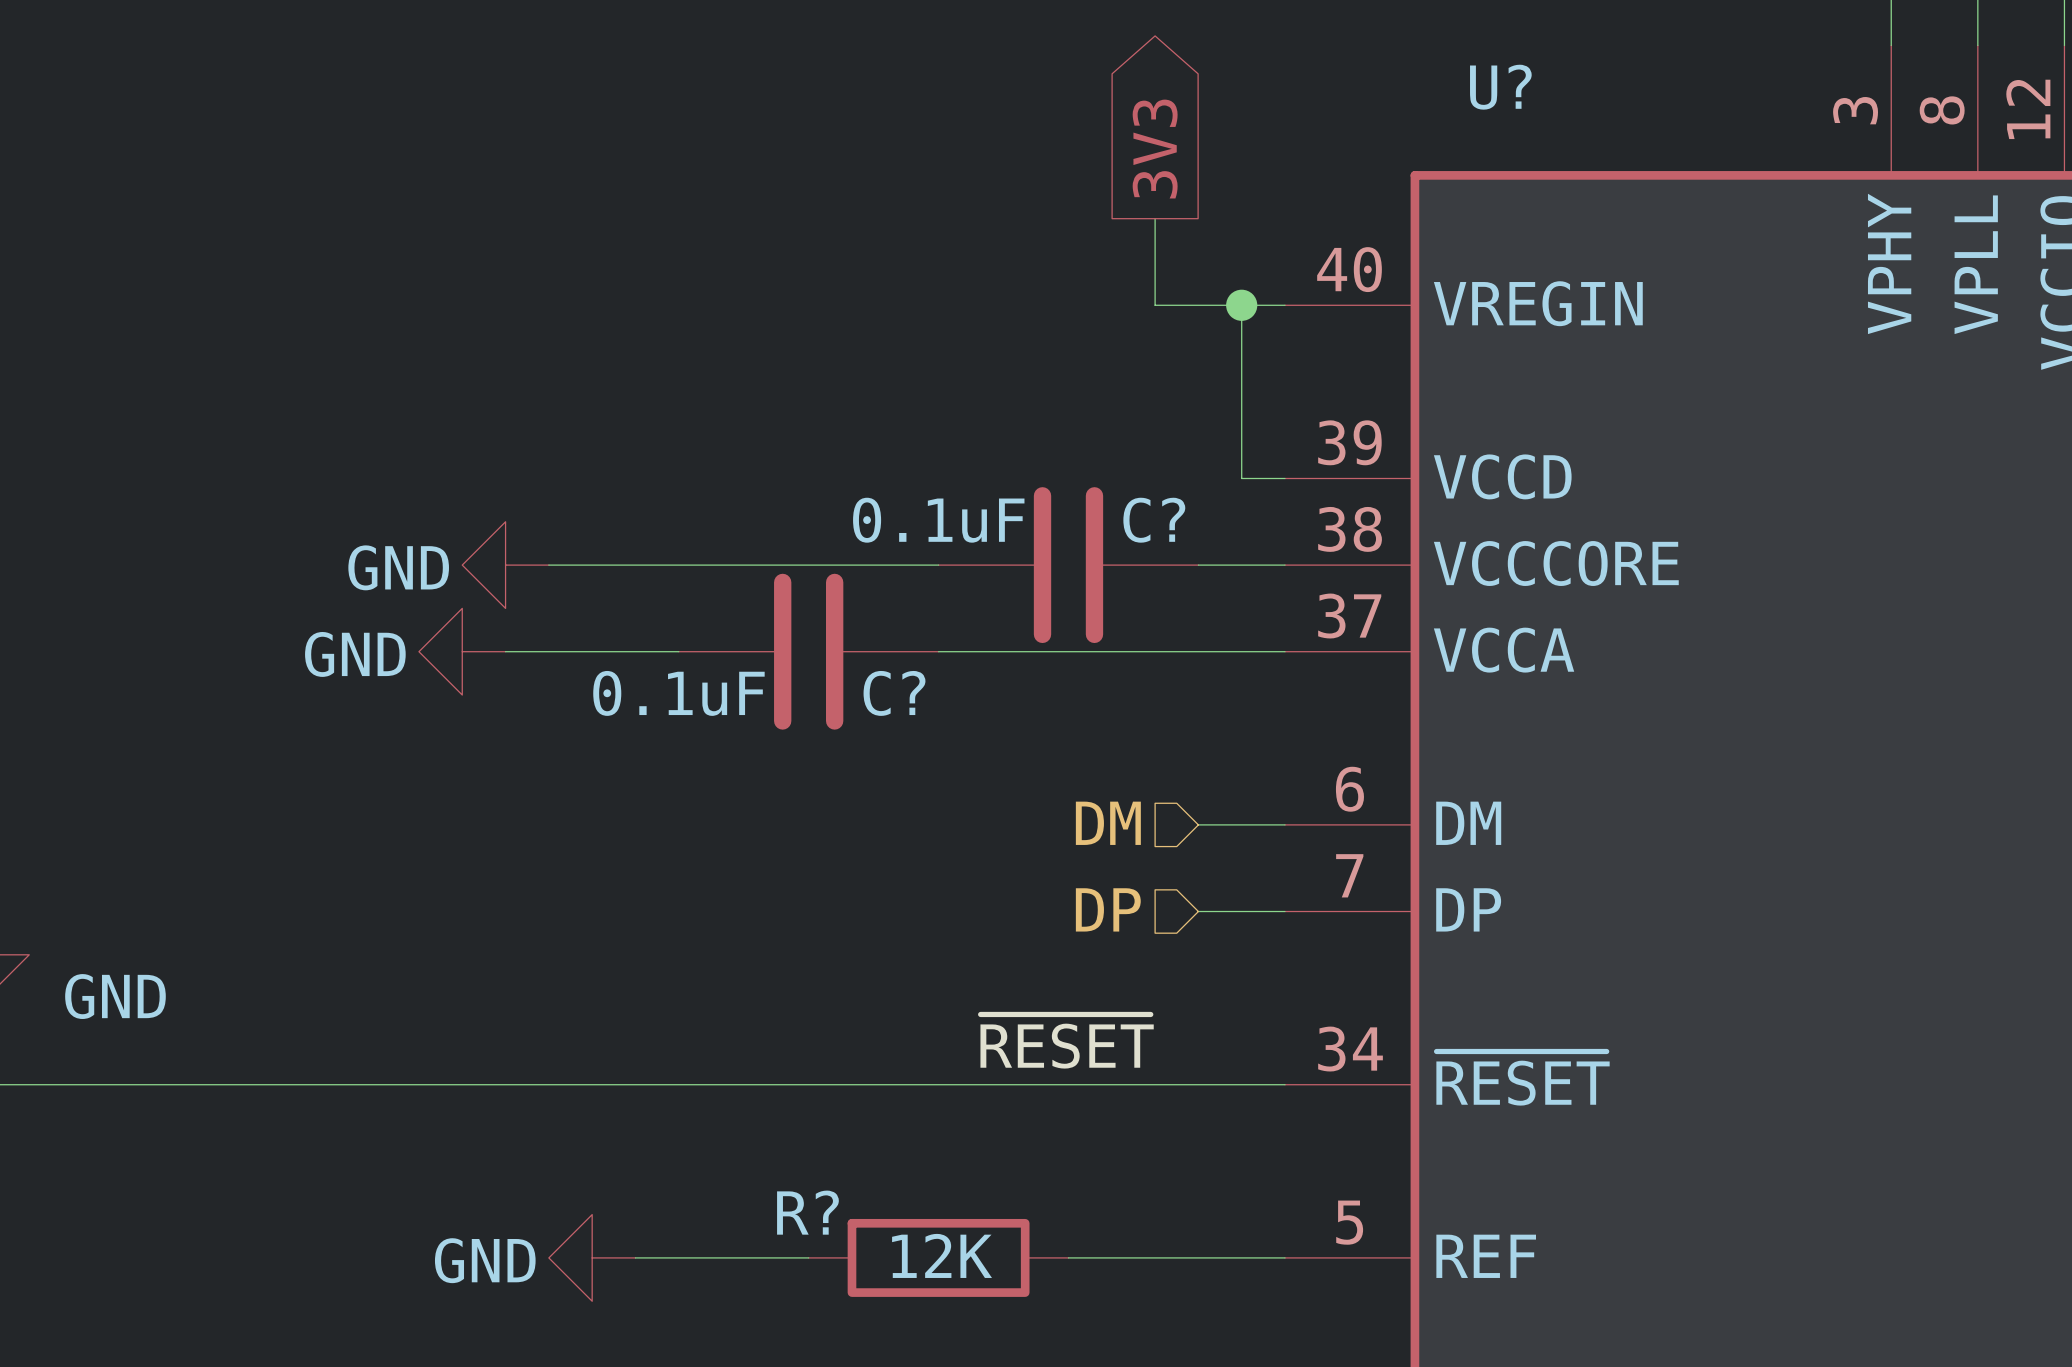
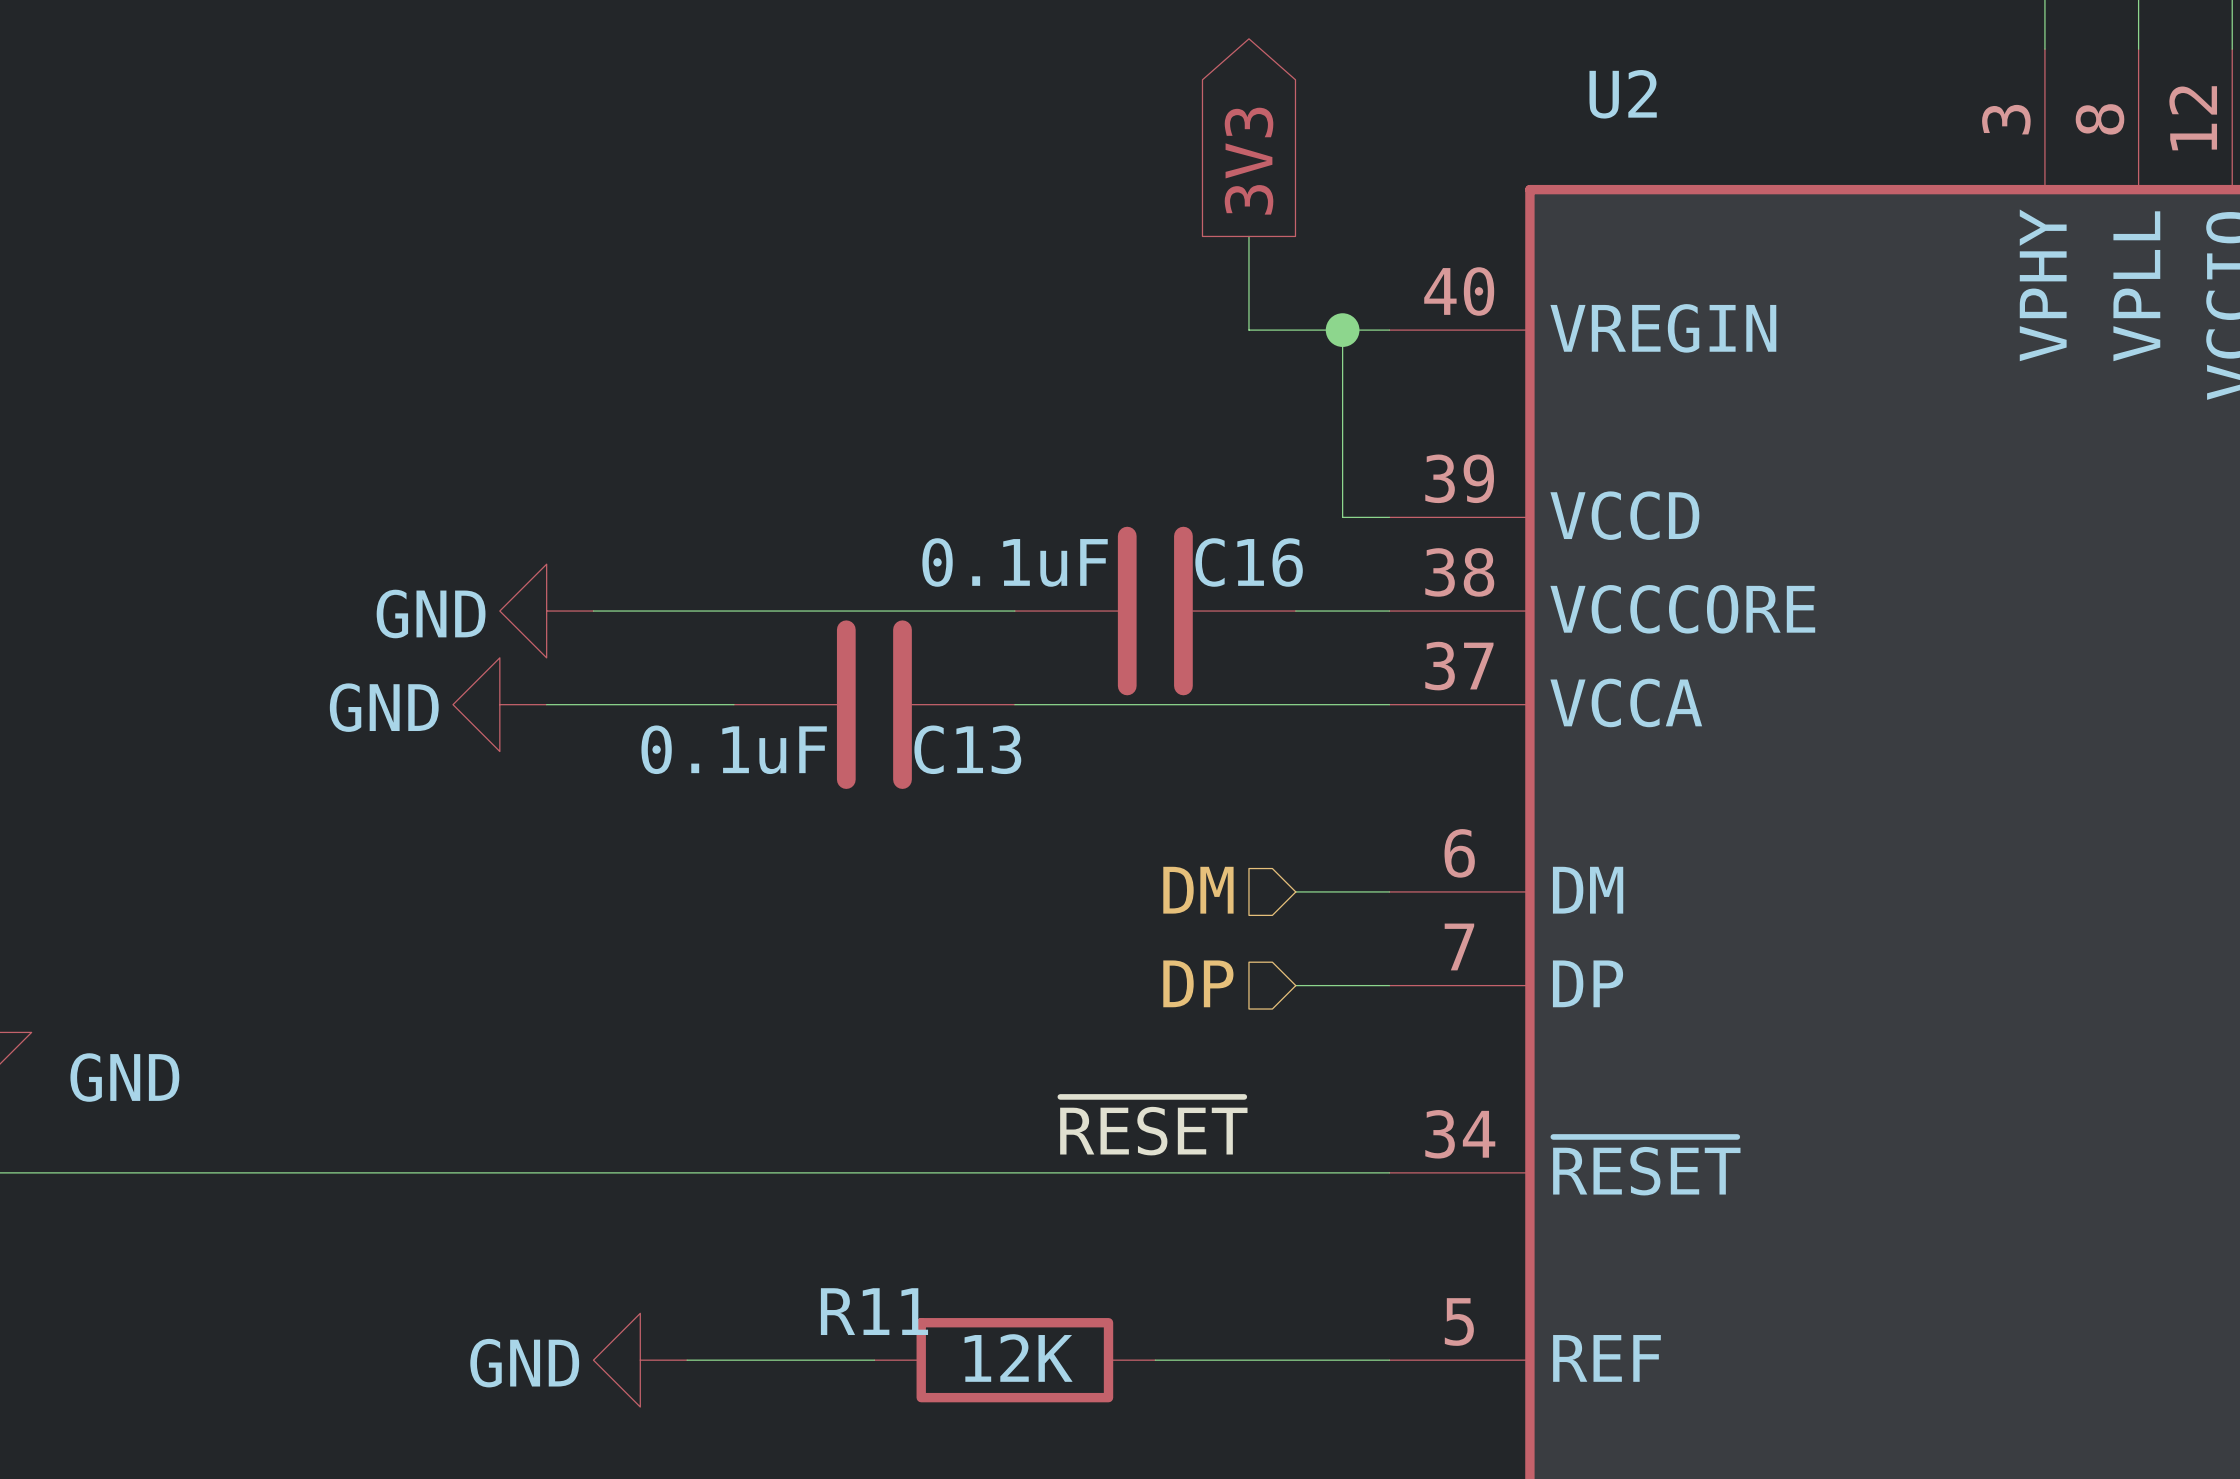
U? name: U? (1500, 87) -> U2 (1623, 94)
C? name: C? (1154, 520) -> C16 (1249, 562)
C? name: C? (894, 693) -> C13 (967, 749)
R? name: R? (807, 1212) -> R11 (874, 1311)

